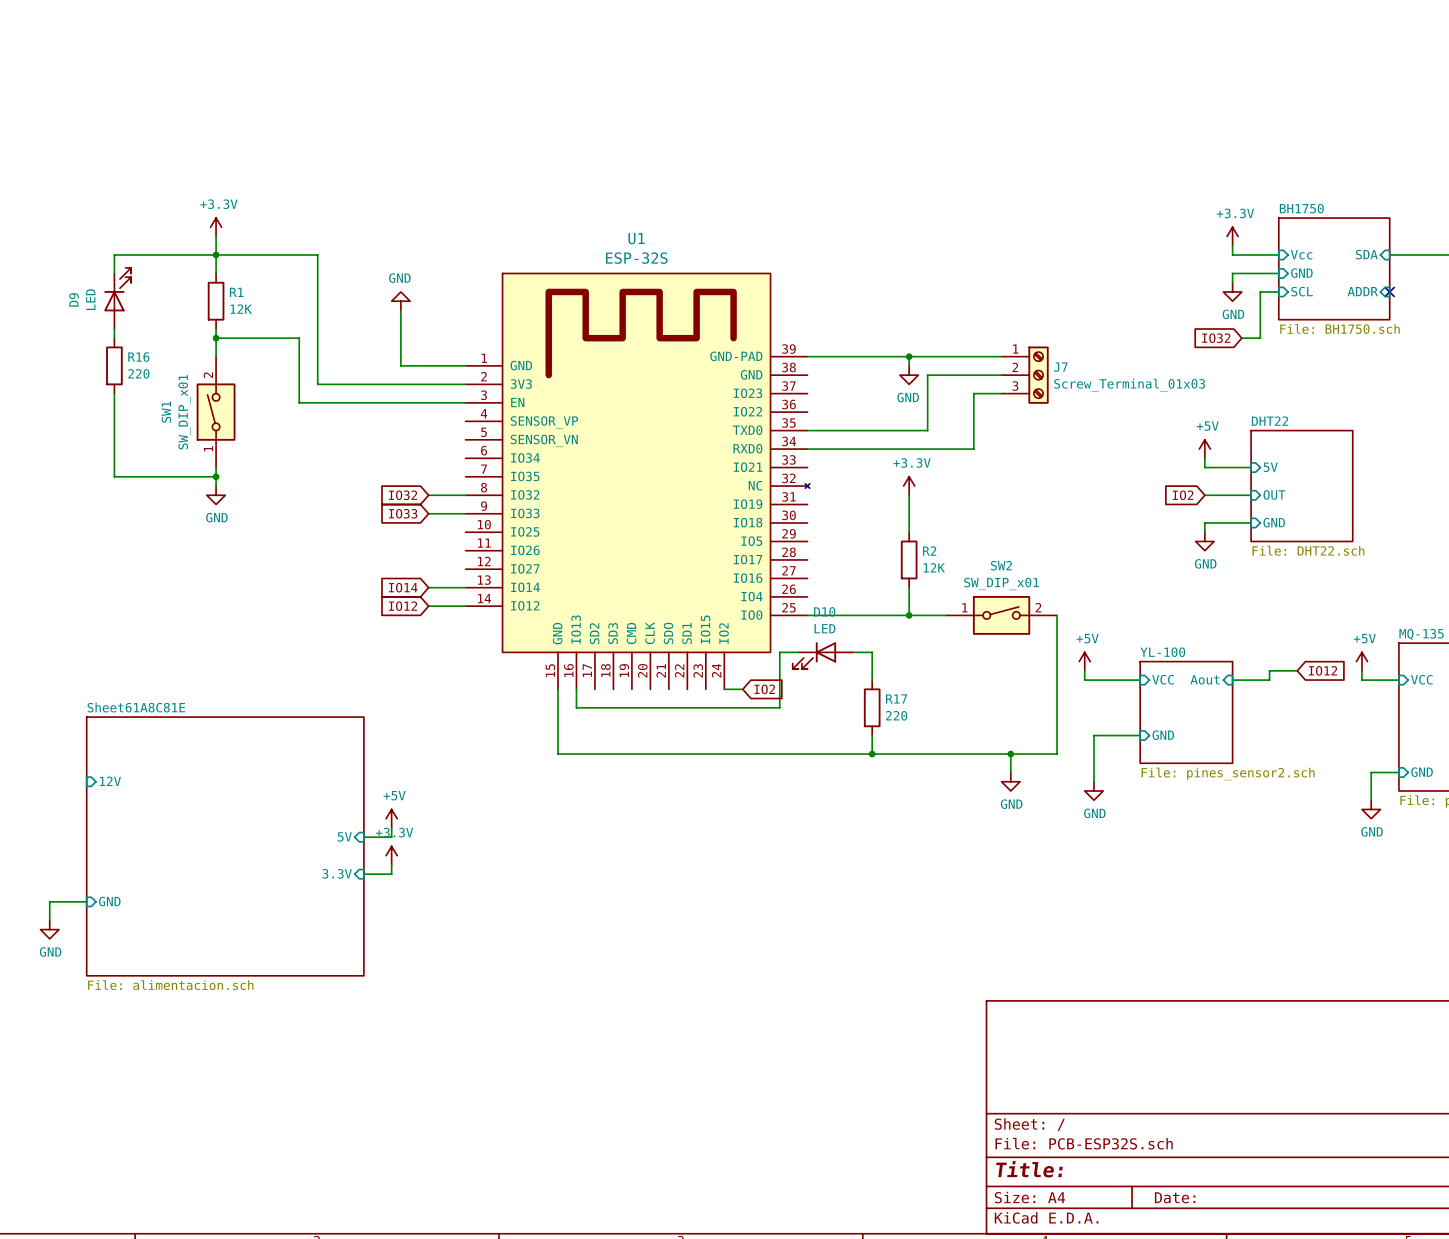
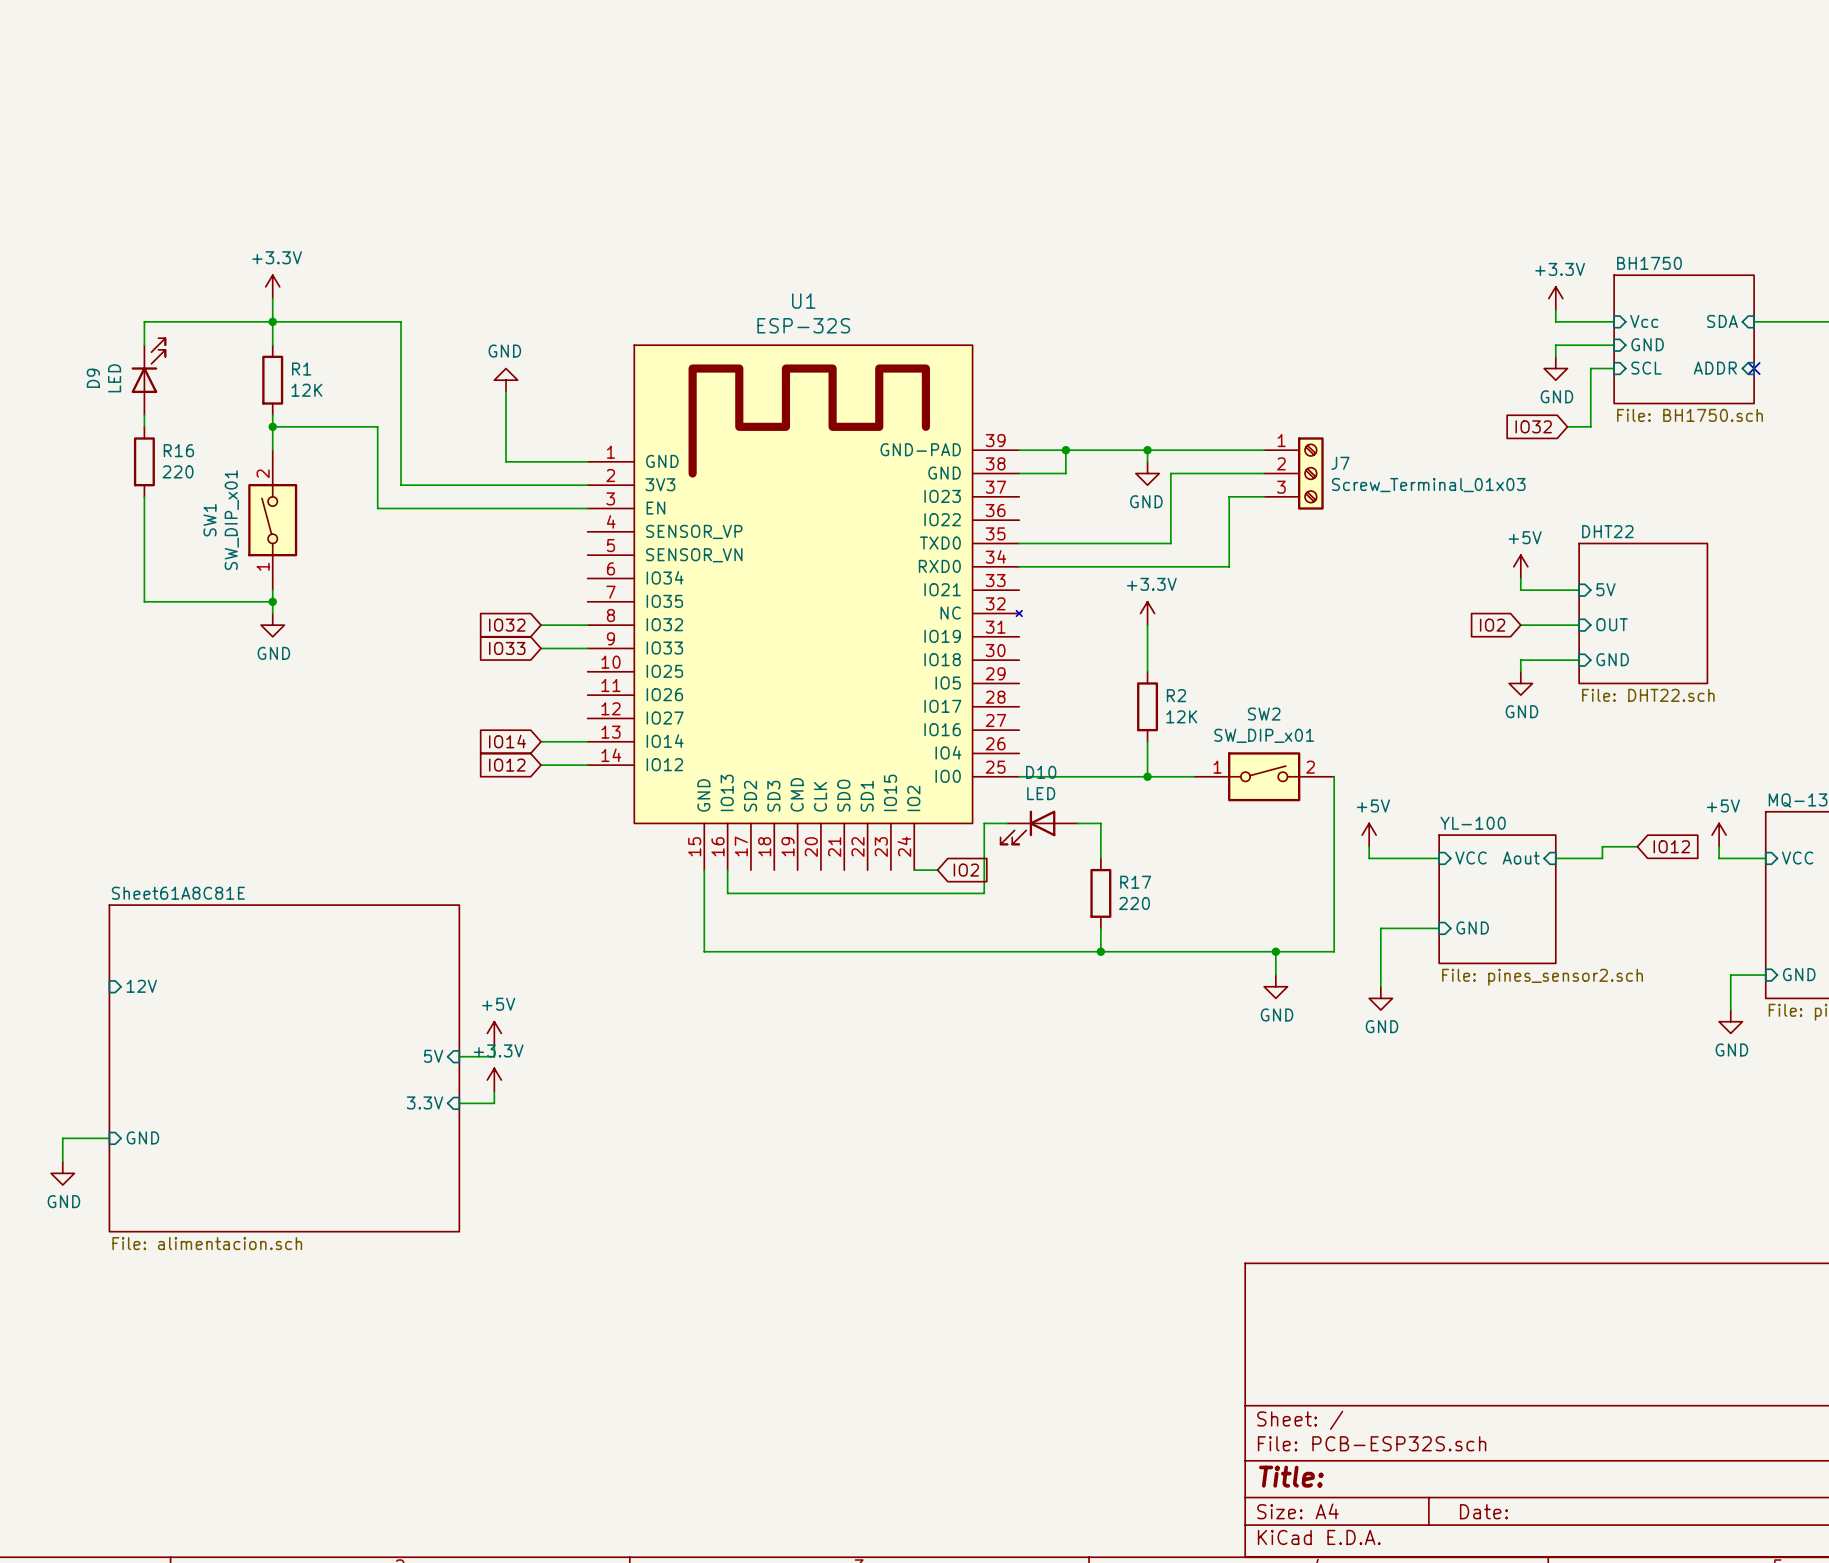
wire: none -> (1065, 450) (1065, 473) (1019, 473)
junction: none -> (1065, 450)

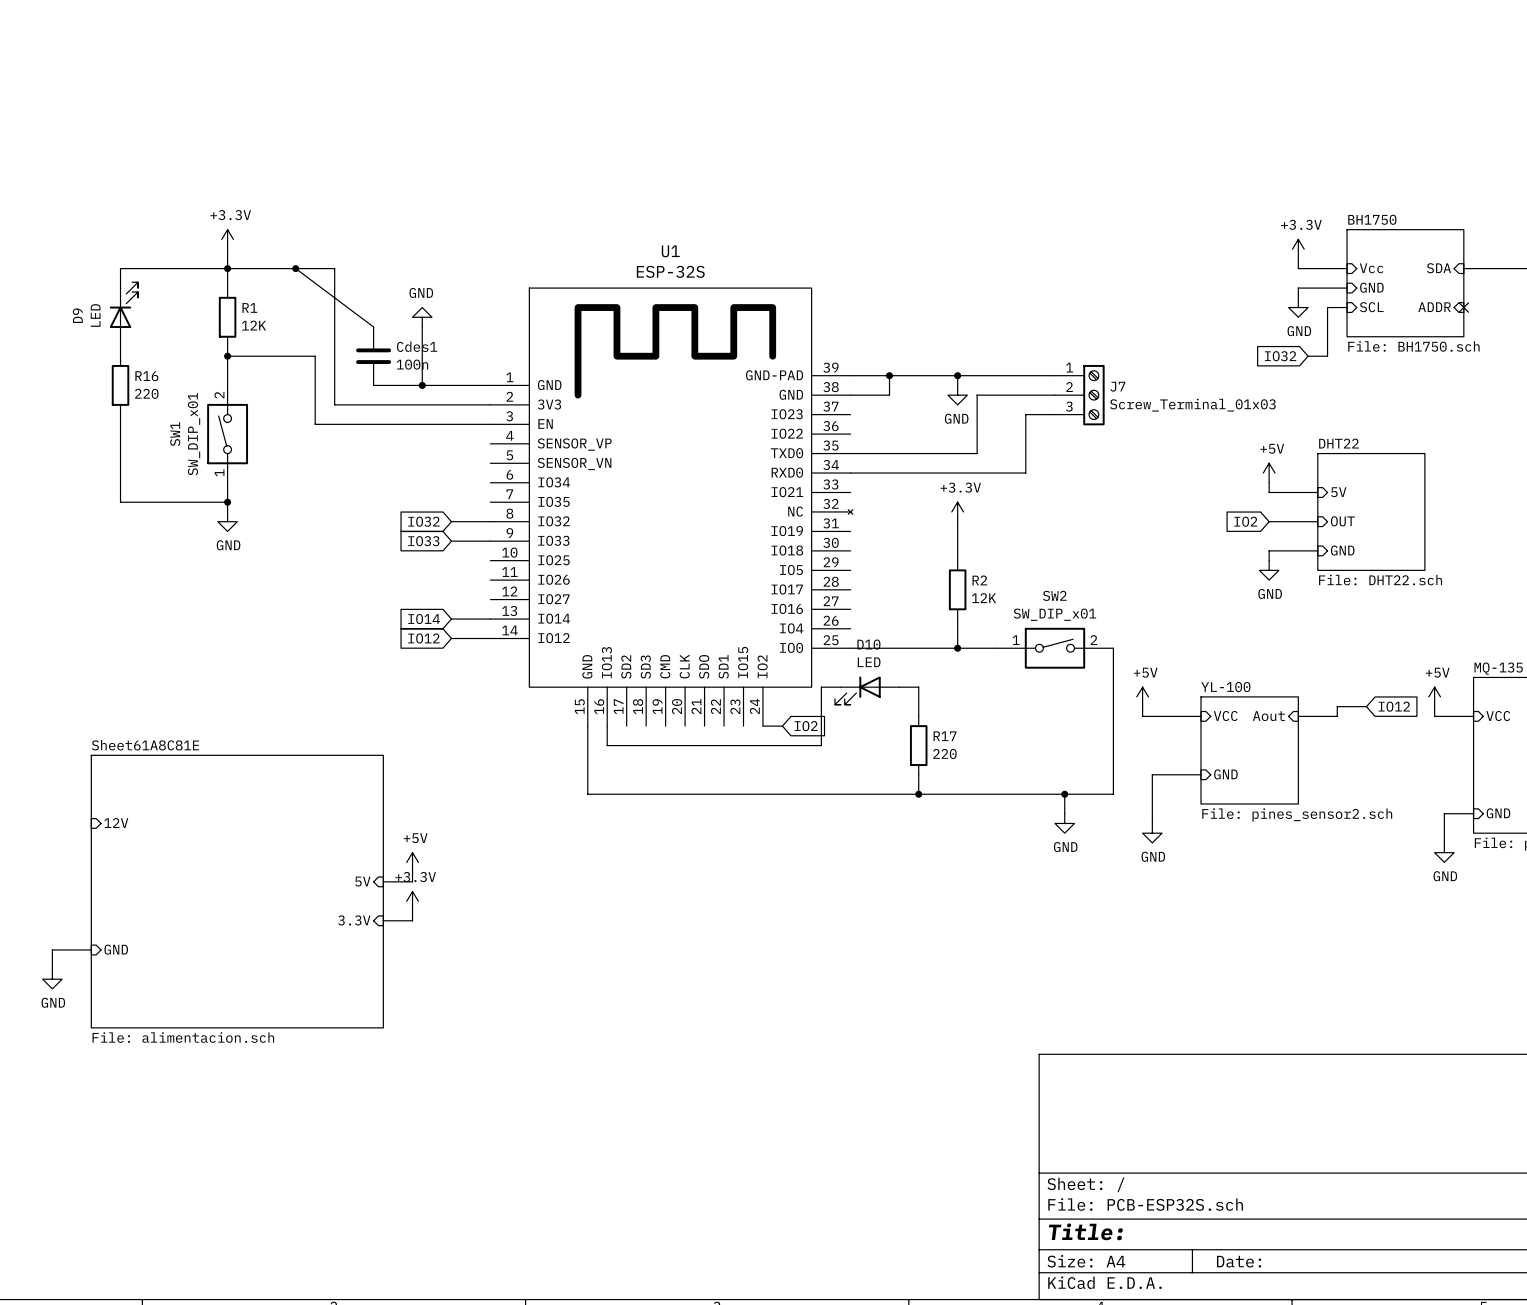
wire: none -> (295, 268) (373, 327)
junction: none -> (295, 268)
Cdes1: none -> 100n (373, 356)
wire: none -> (373, 385) (422, 385)
junction: none -> (422, 385)

